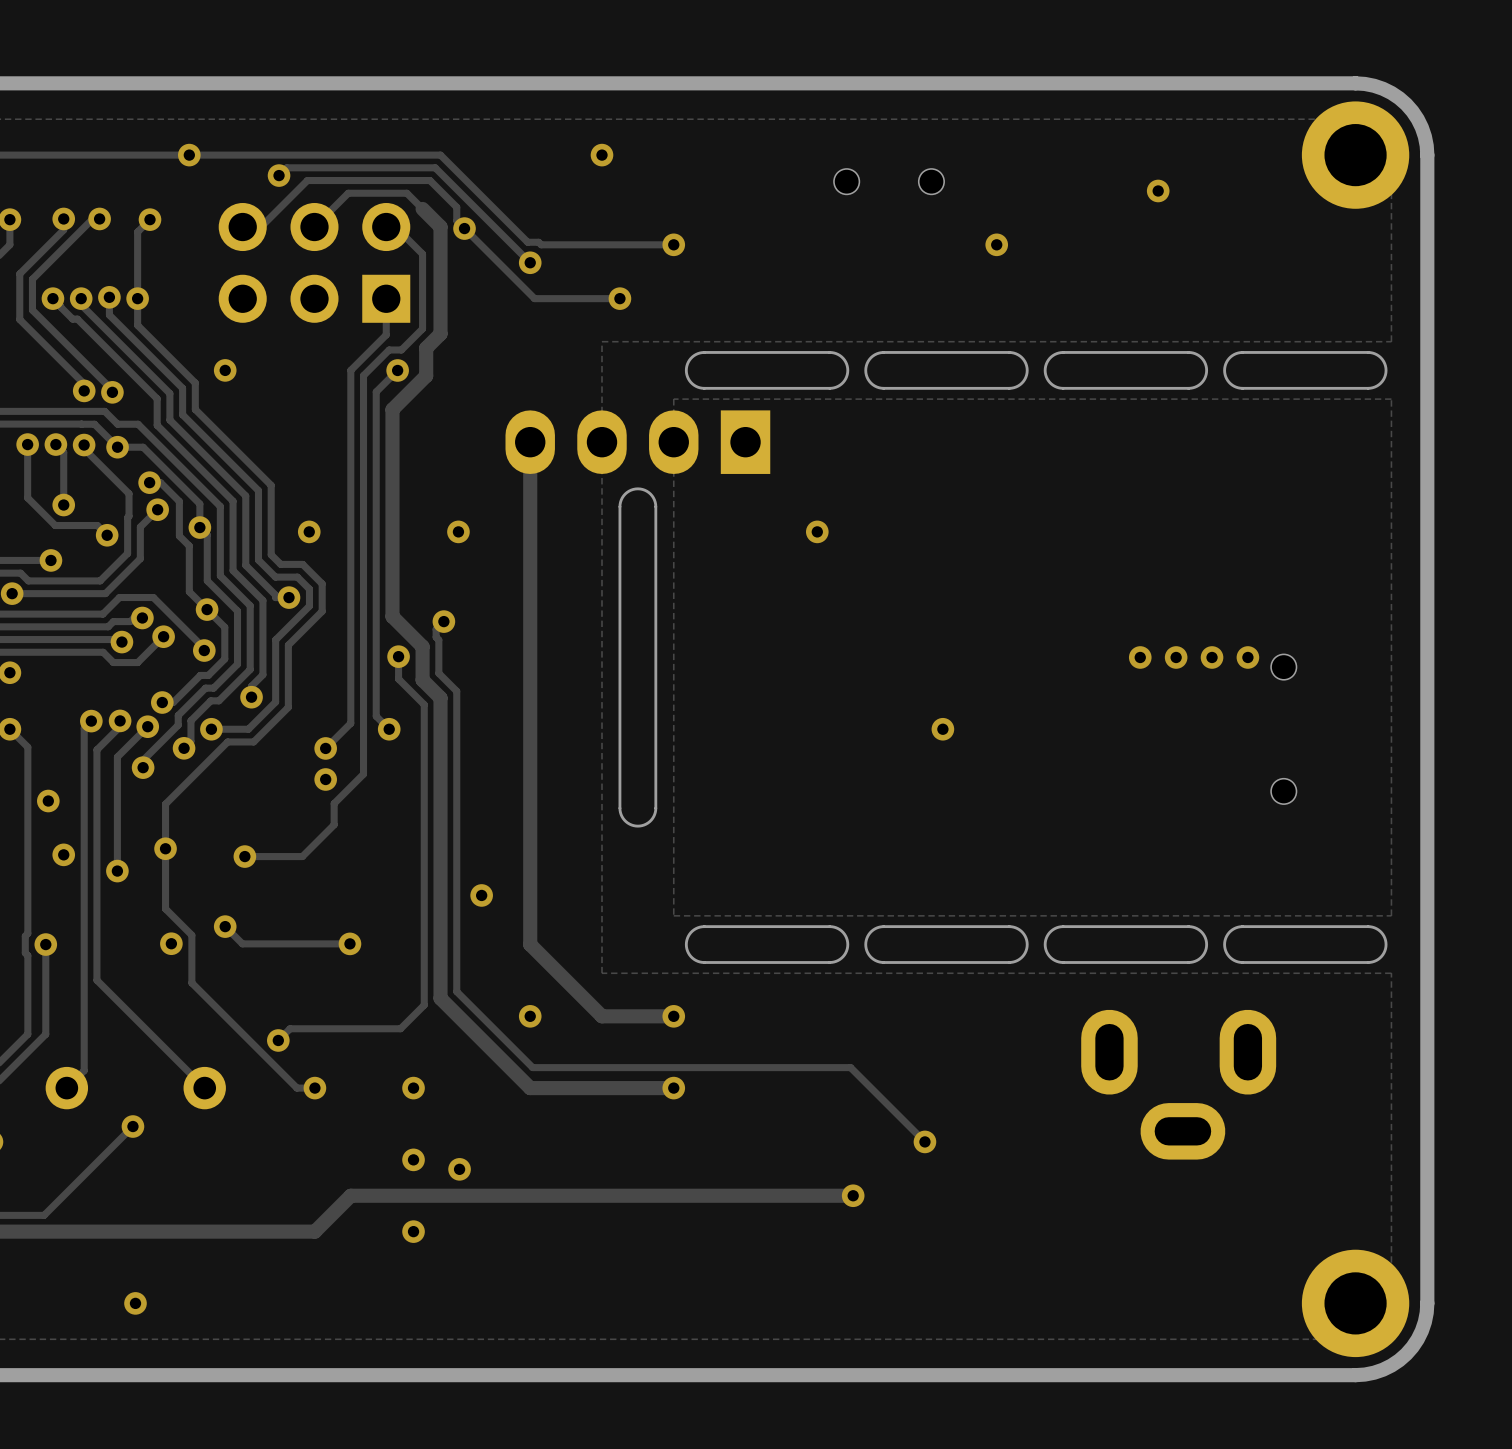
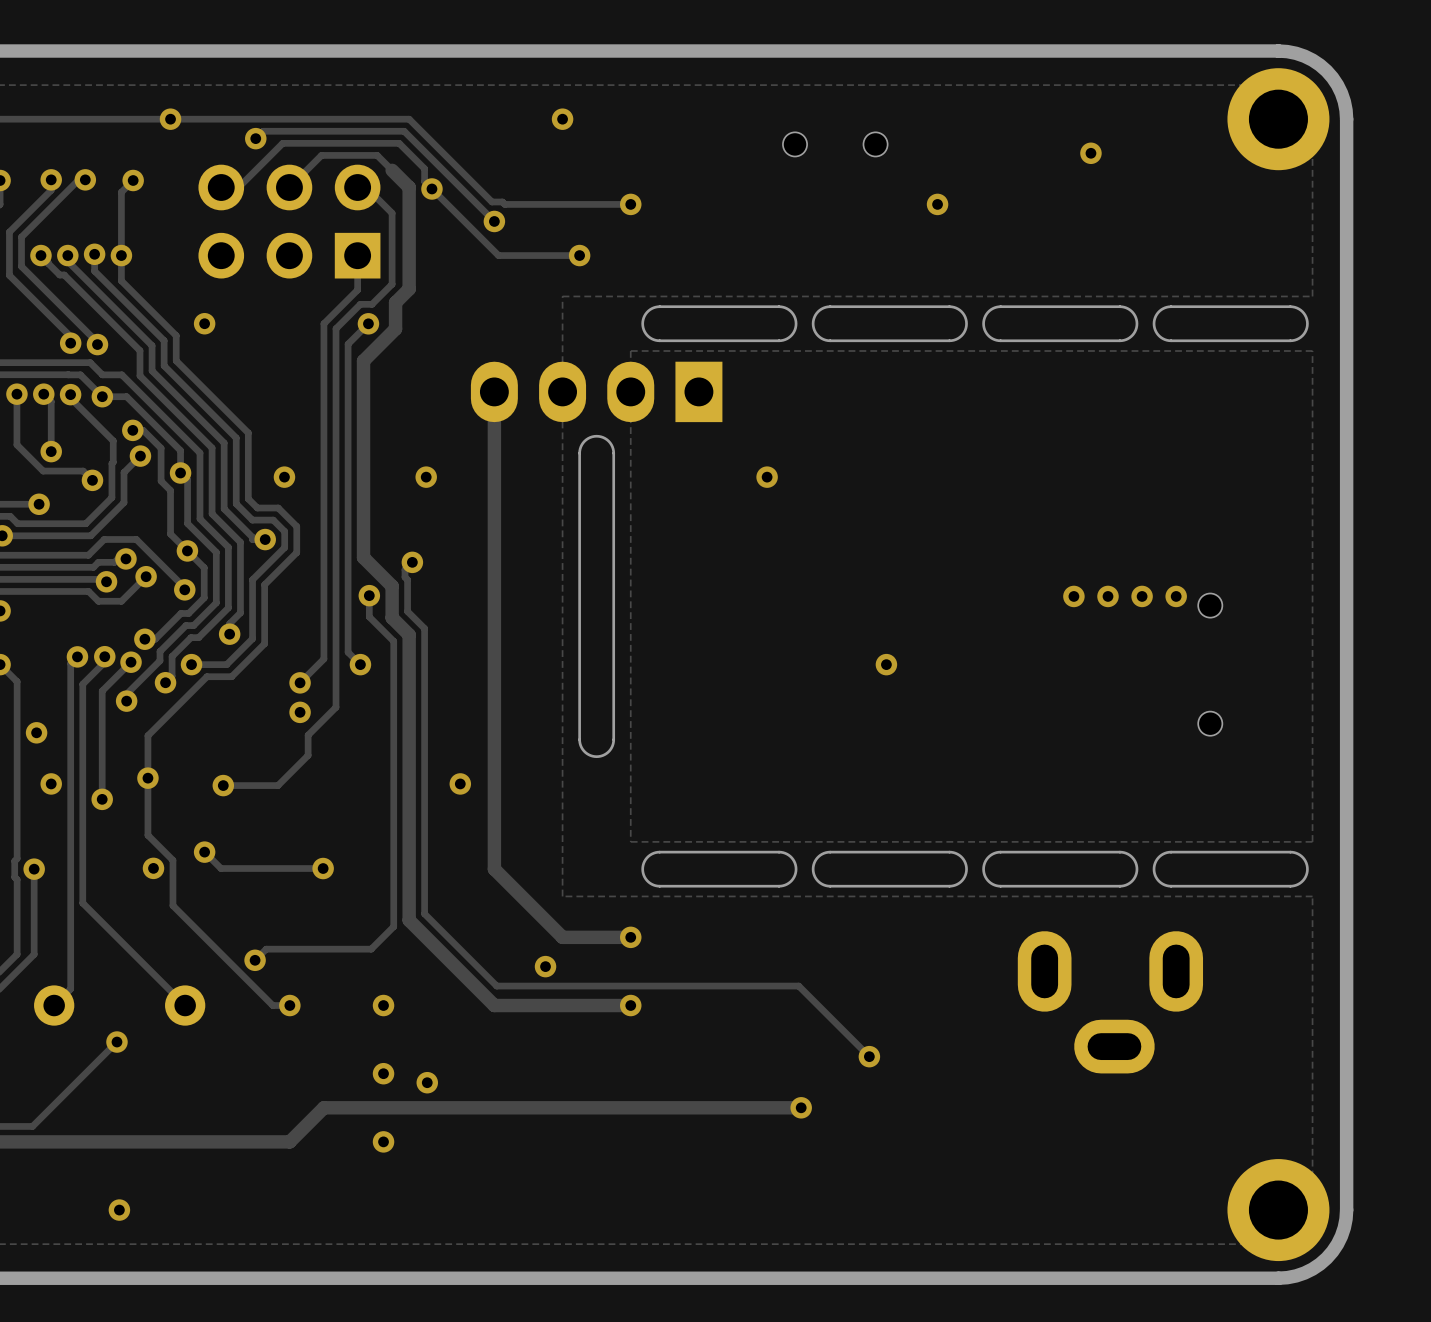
via position: (481, 895) -> (460, 783)
via position: (530, 1016) -> (545, 966)

